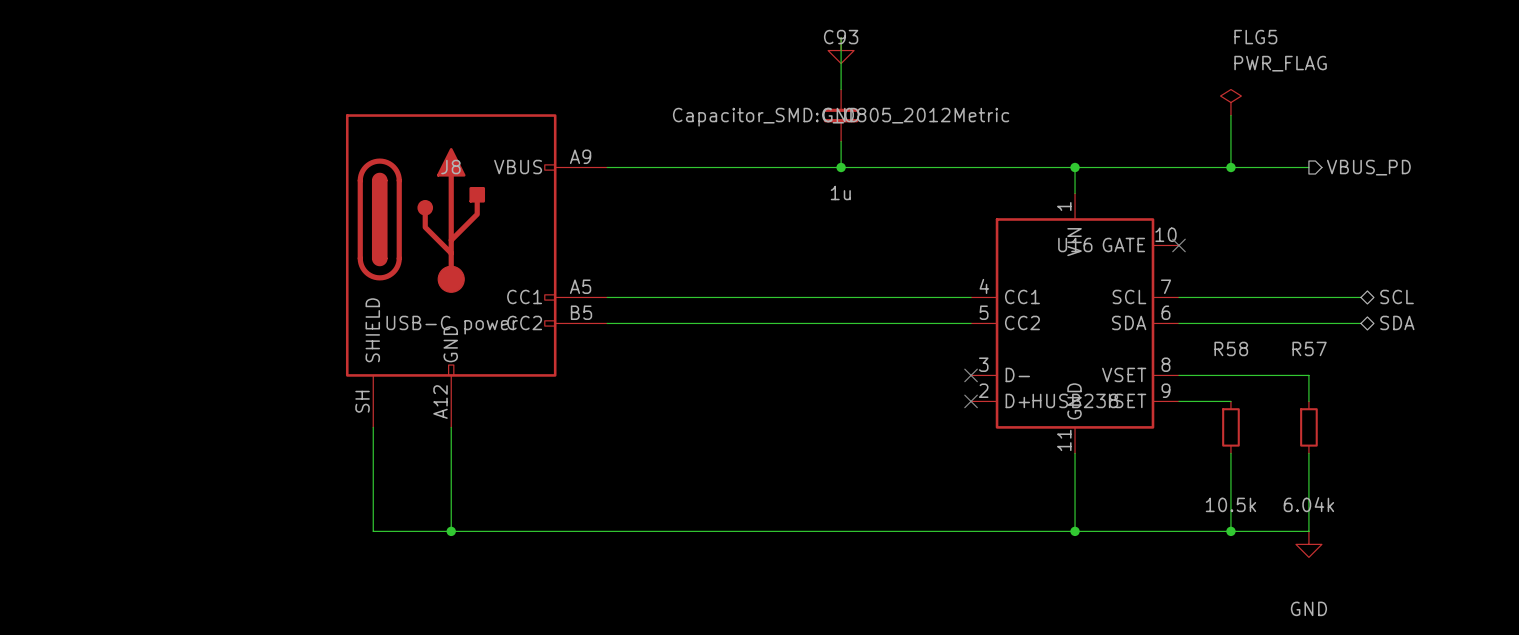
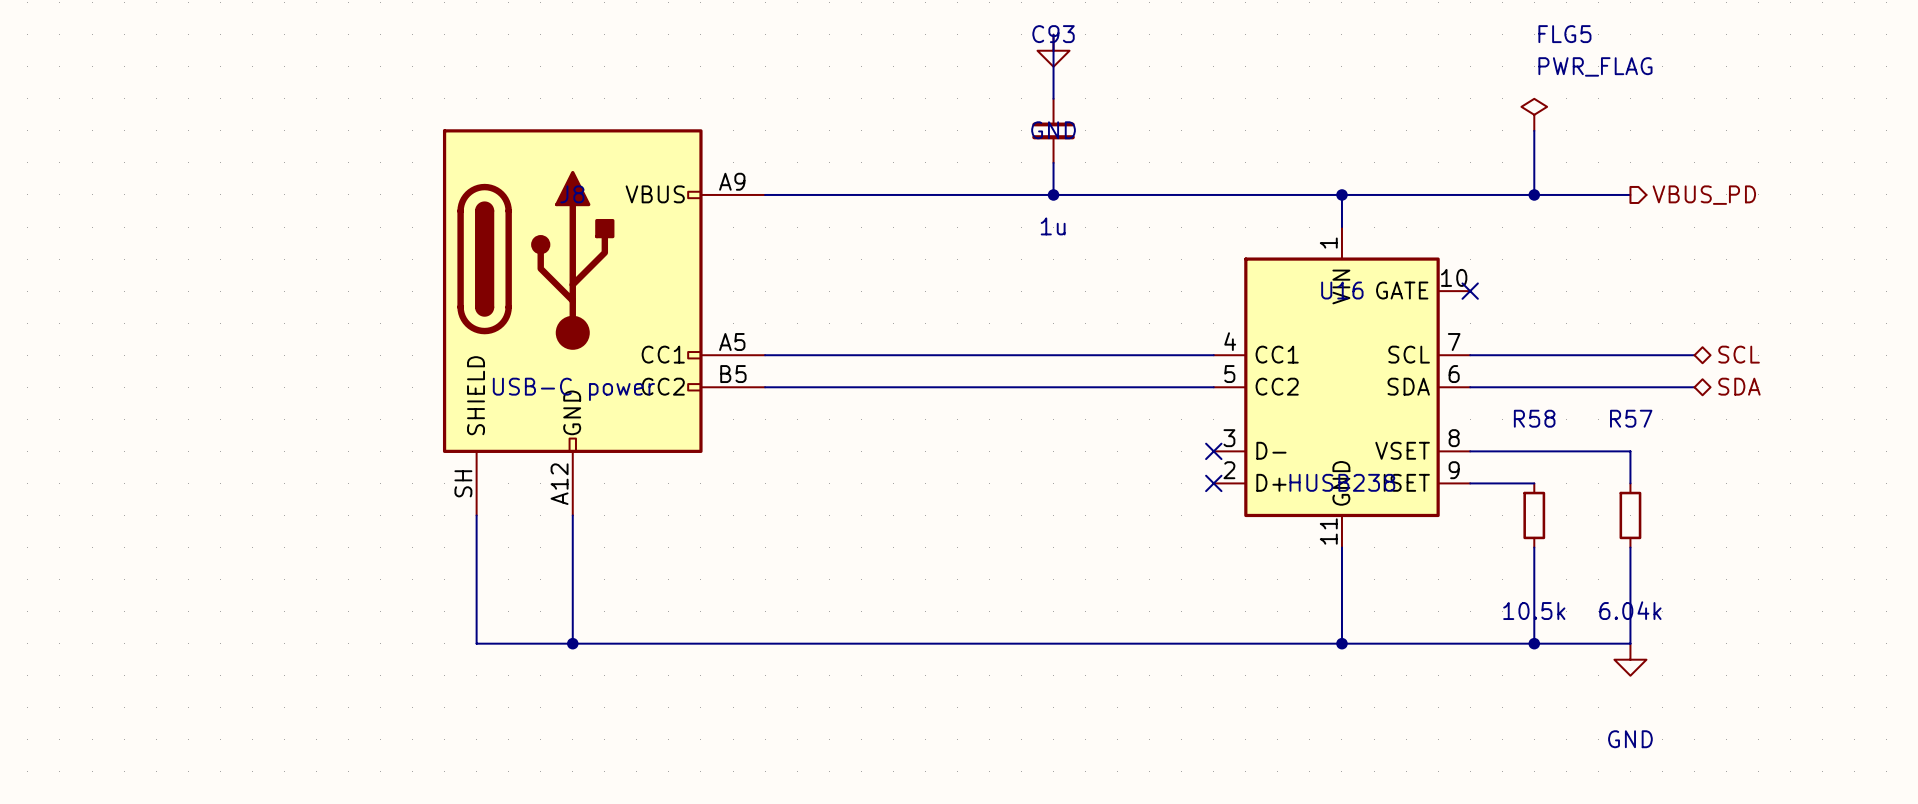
C93 text: Capacitor_SMD:C_0805_2012Metric (841, 117) -> none

